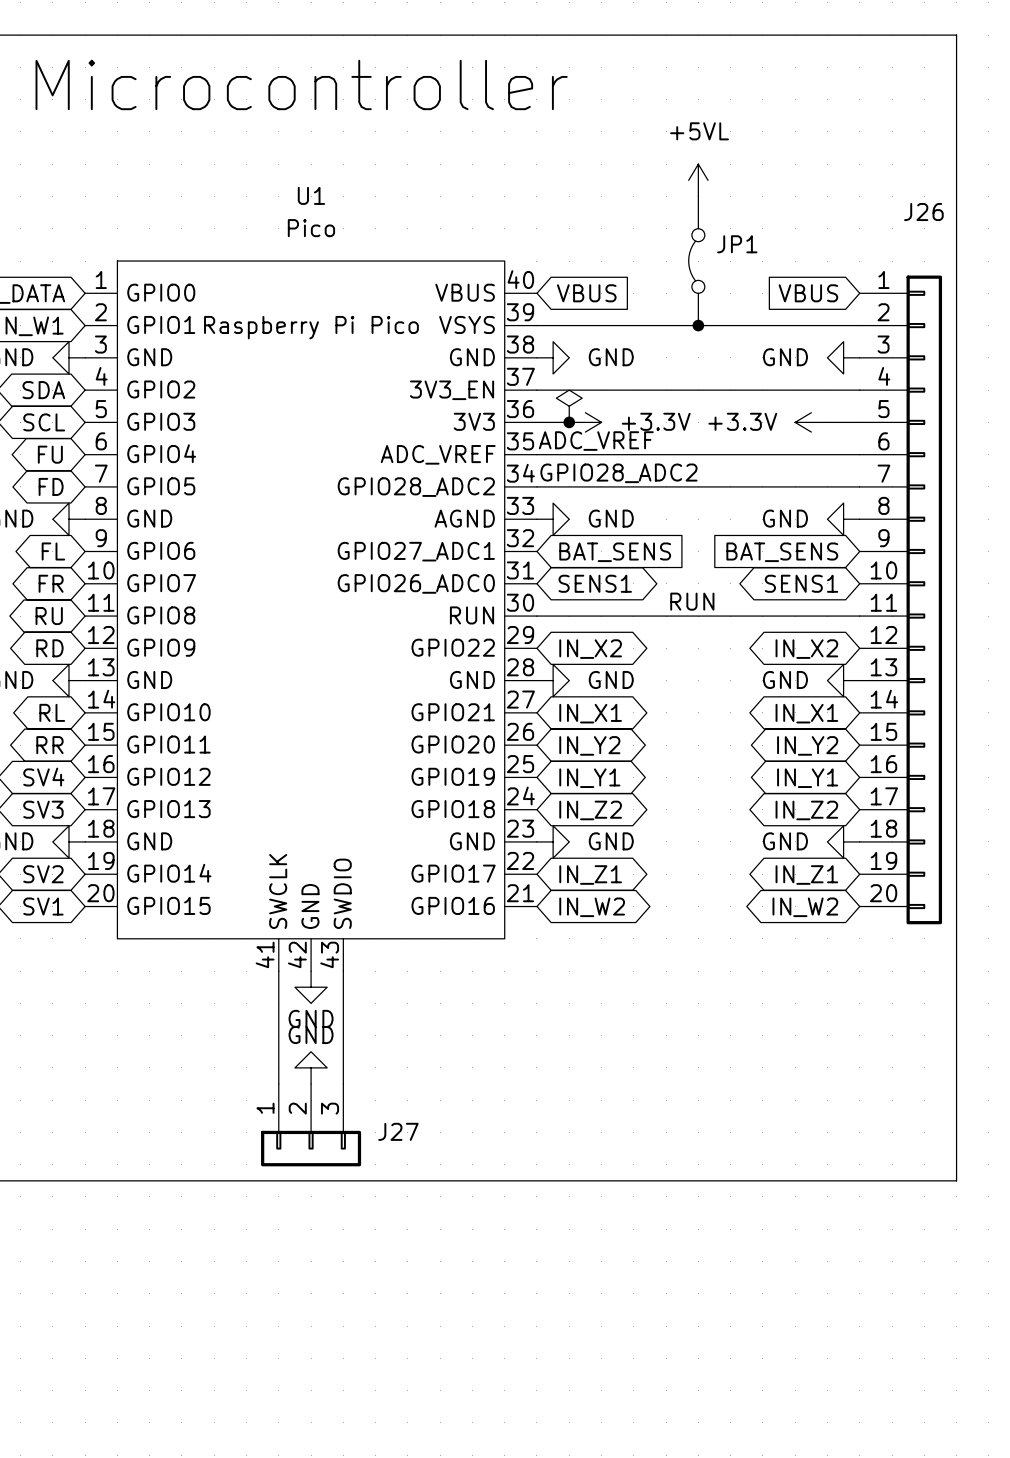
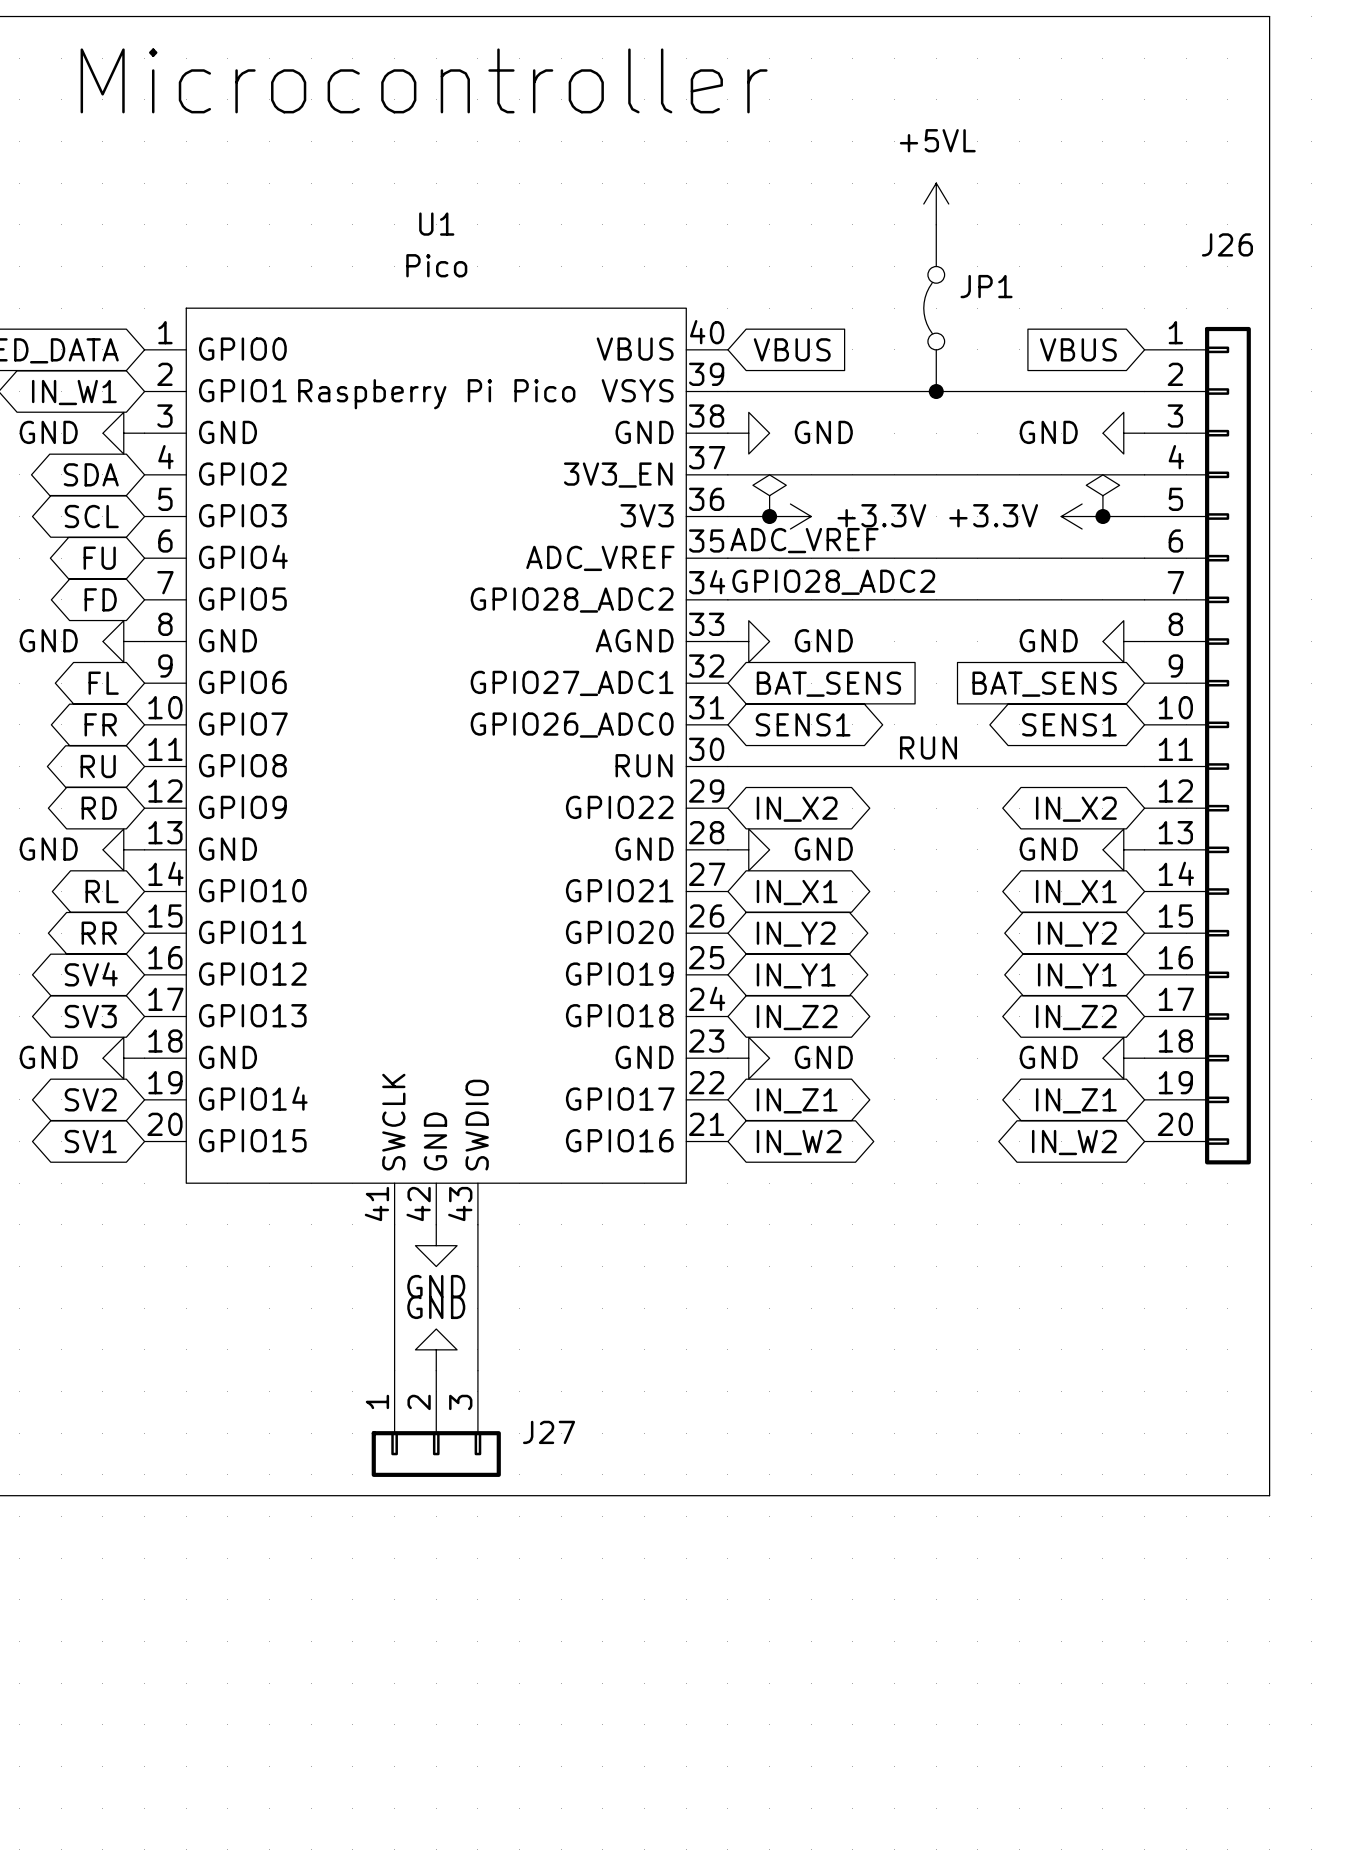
power symbol: none -> (1102, 495)
junction: none -> (1102, 516)

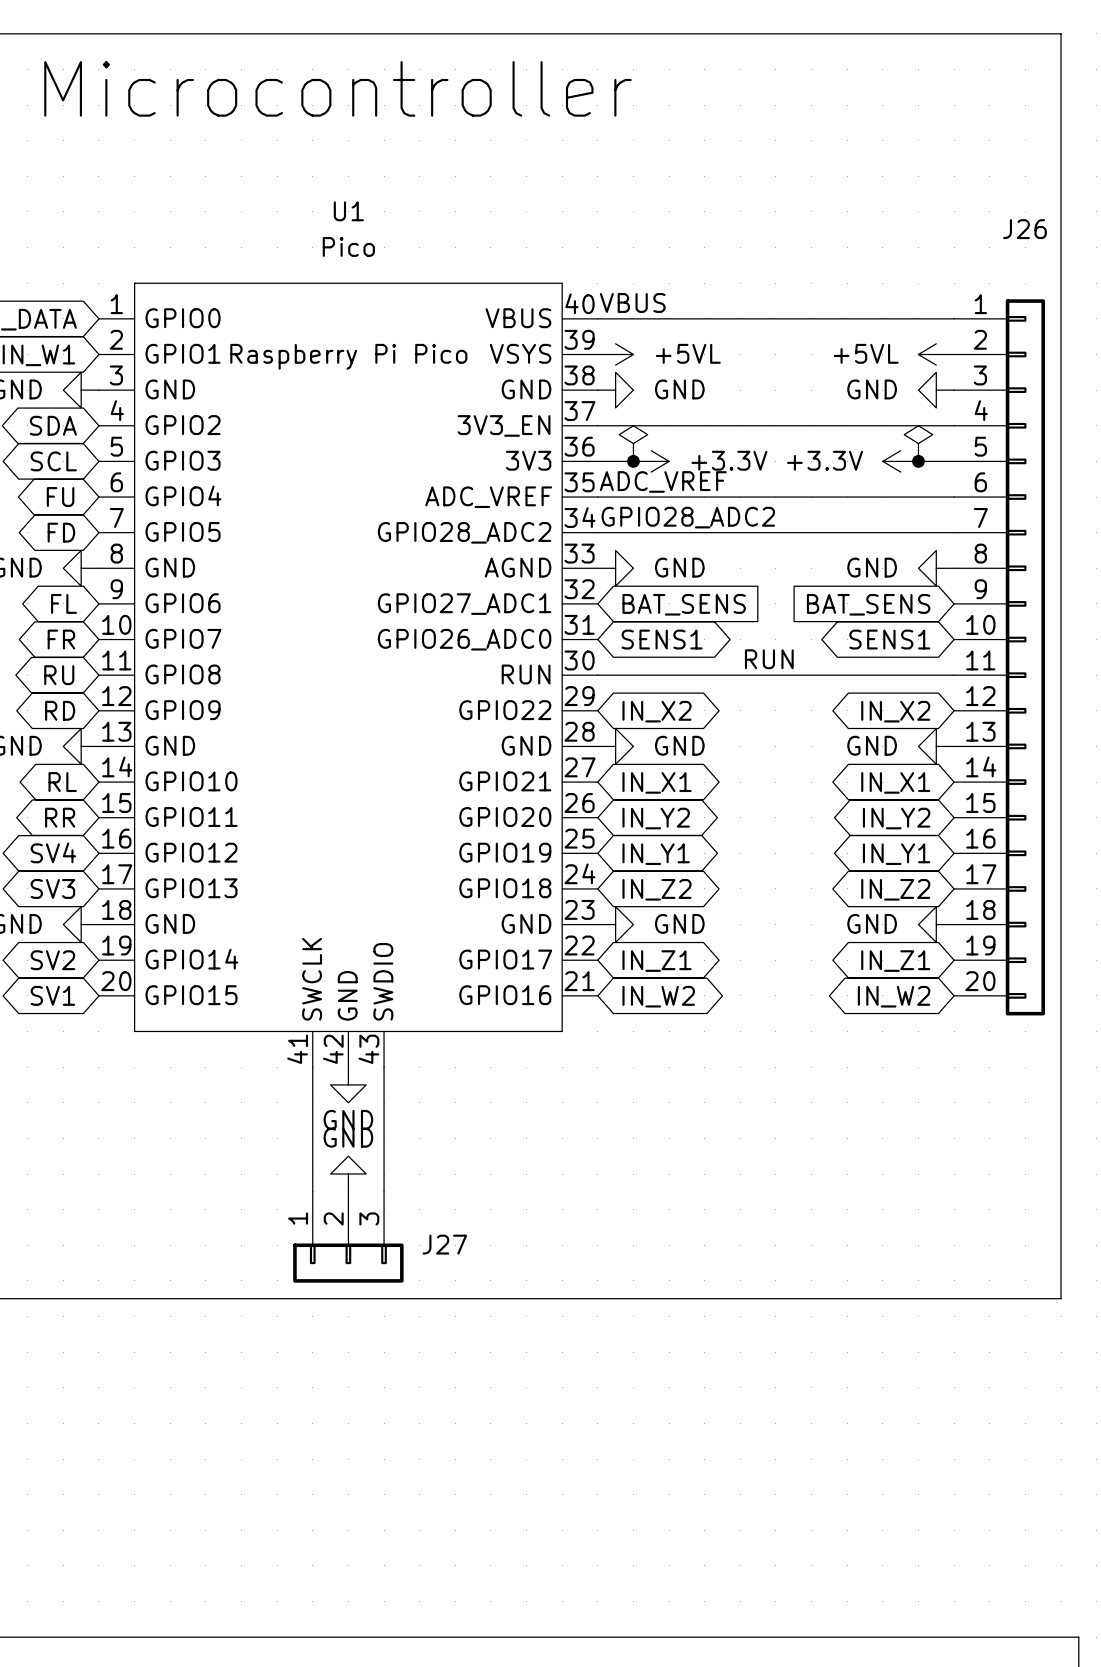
power symbol: +5VL (936, 204) -> none
JP1: (934, 308) -> none
label: none -> VBUS (632, 302)
global label: VBUS (792, 349) -> none
global label: VBUS (1078, 349) -> none
wire: (727, 391) (1144, 391) -> (597, 318) (954, 318)
power symbol: none -> +5VL (615, 354)
junction: (936, 391) -> none
power symbol: none -> +5VL (936, 354)

